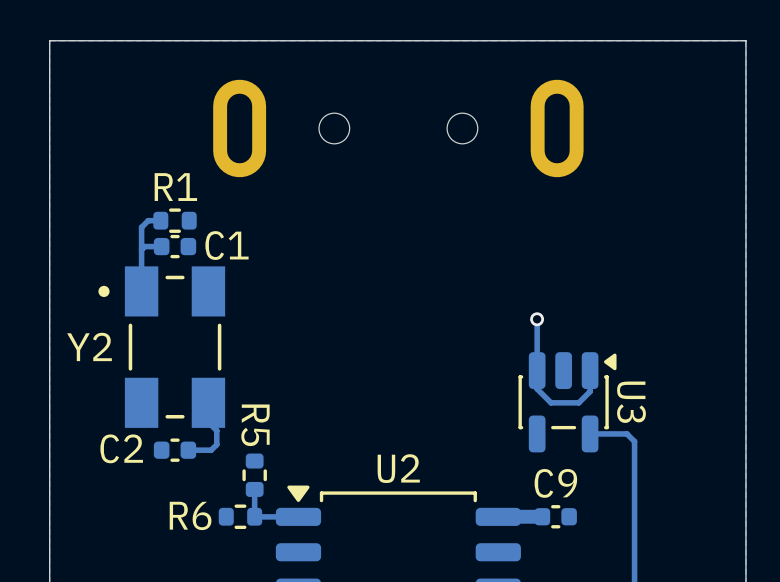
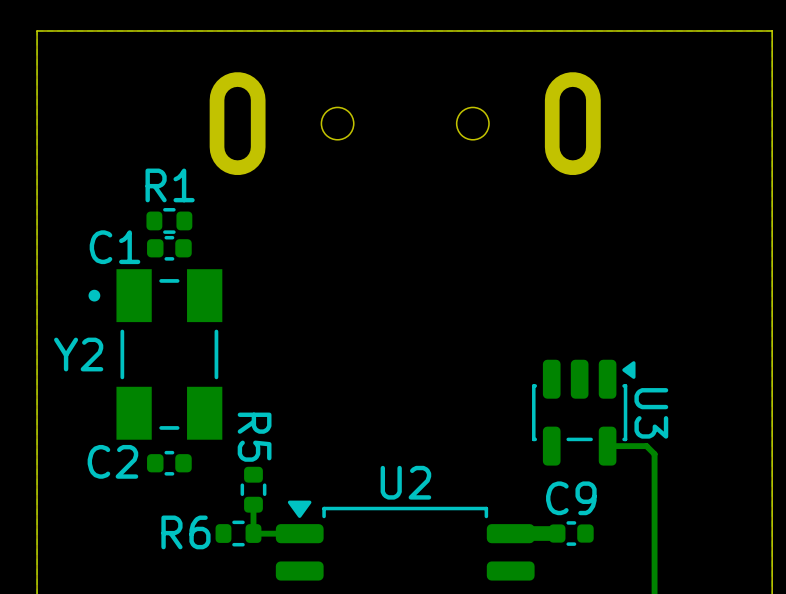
track: (160, 220) (148, 220) (141, 227) (141, 291) -> none
C1 name position: C1 (227, 245) -> C1 (114, 247)
track: (161, 246) (144, 246) (141, 249) -> none
track: (537, 319) (537, 388) (551, 402) (578, 402) (590, 391) (590, 370) -> none
via: (537, 319) -> none
track: (208, 402) (208, 422) (216, 430) (216, 444) (211, 450) (188, 450) -> none

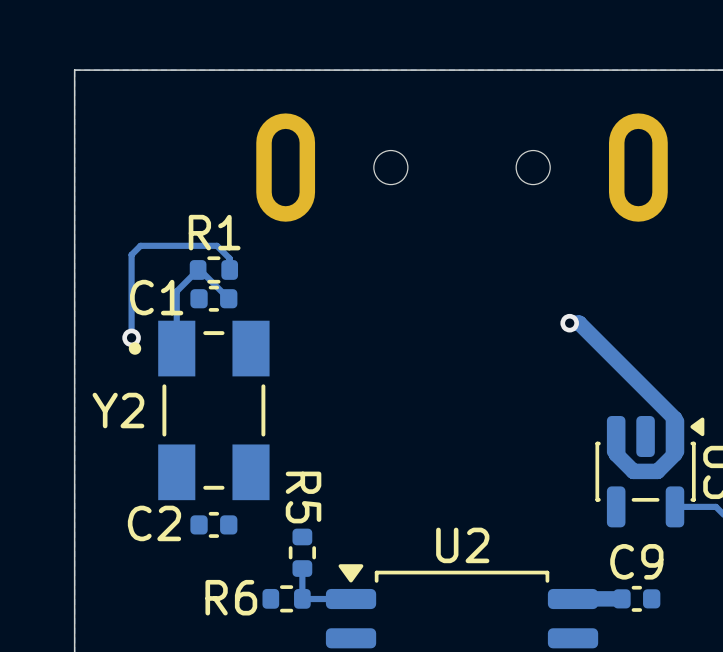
track: none -> (229, 269) (229, 258) (216, 245) (140, 245) (131, 254) (131, 337)
track: none -> (228, 298) (198, 269) (176, 291) (176, 348)
track: none -> (569, 323) (579, 323) (674, 418) (674, 453) (657, 471) (633, 471) (616, 454) (616, 436)
via: none -> (569, 323)
via: none -> (131, 337)

